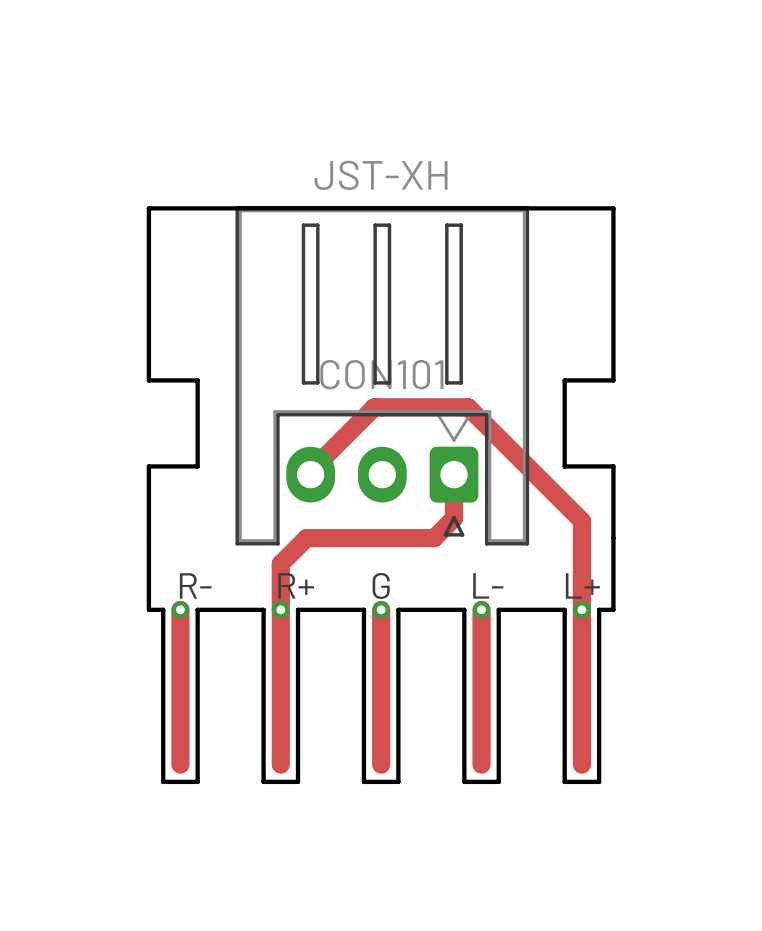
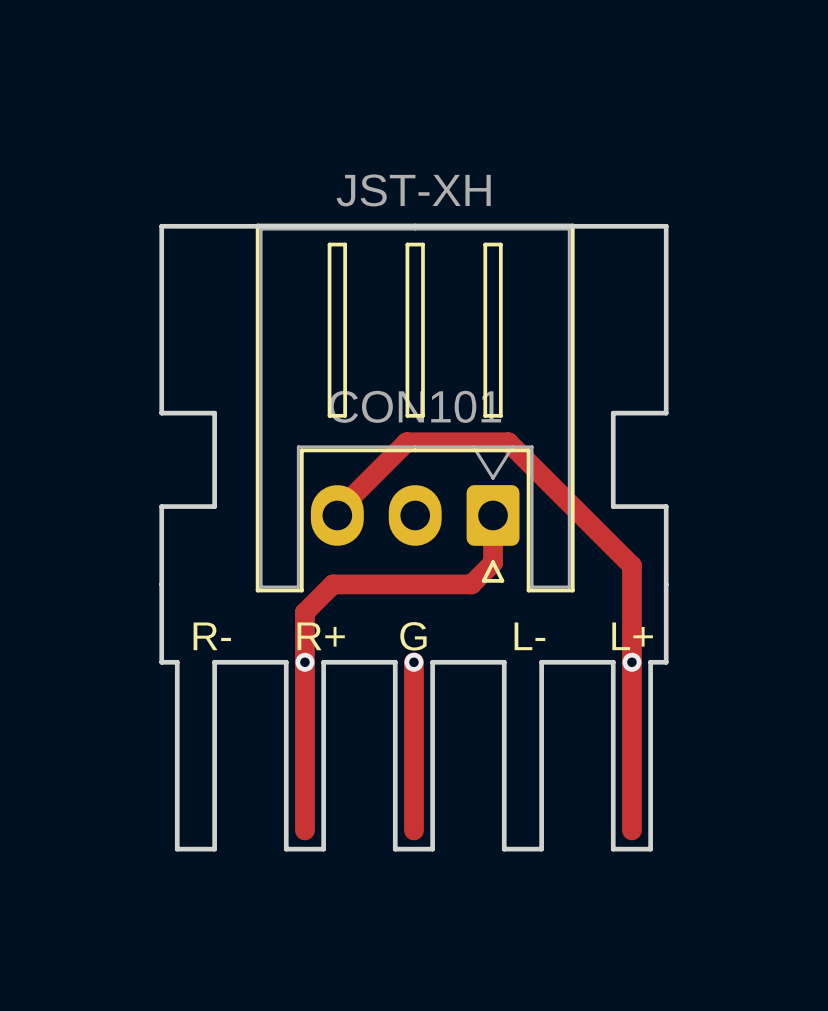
track: (180, 609) (180, 764) -> none
via: (180, 609) -> none
track: (481, 609) (481, 764) -> none
via: (481, 609) -> none

